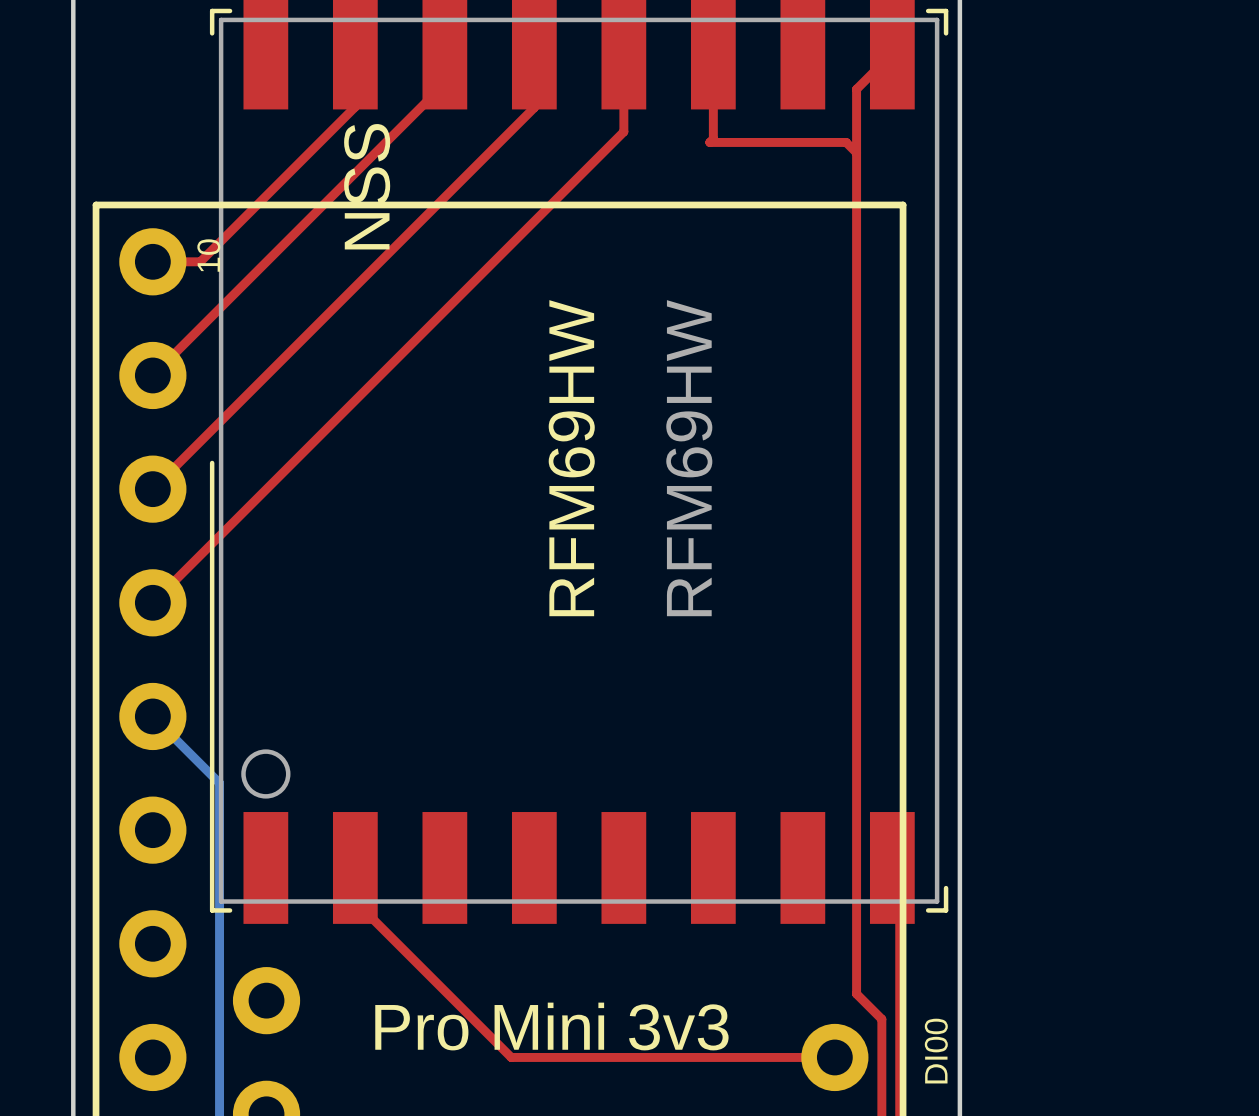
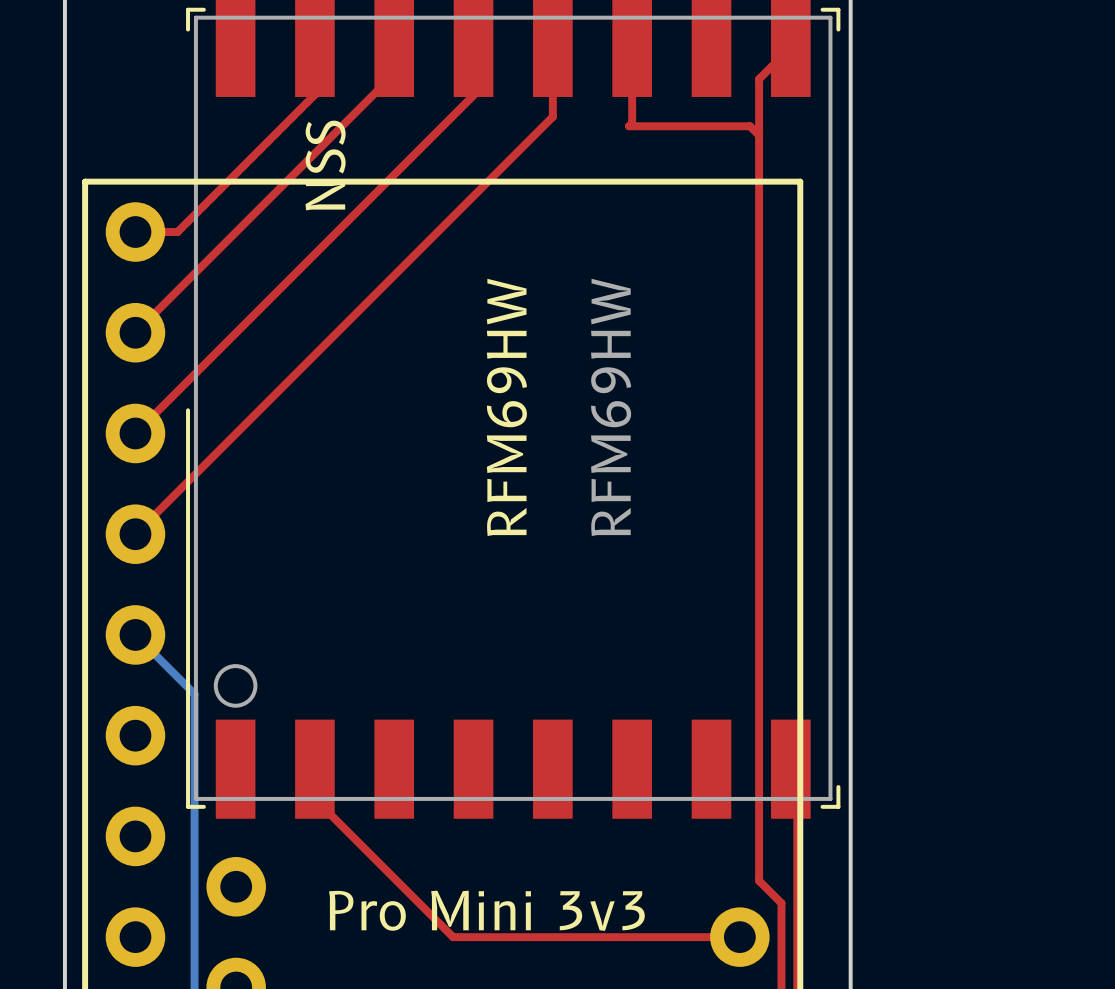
text: 10 (208, 255) -> none
text: DI00 (936, 1051) -> none

